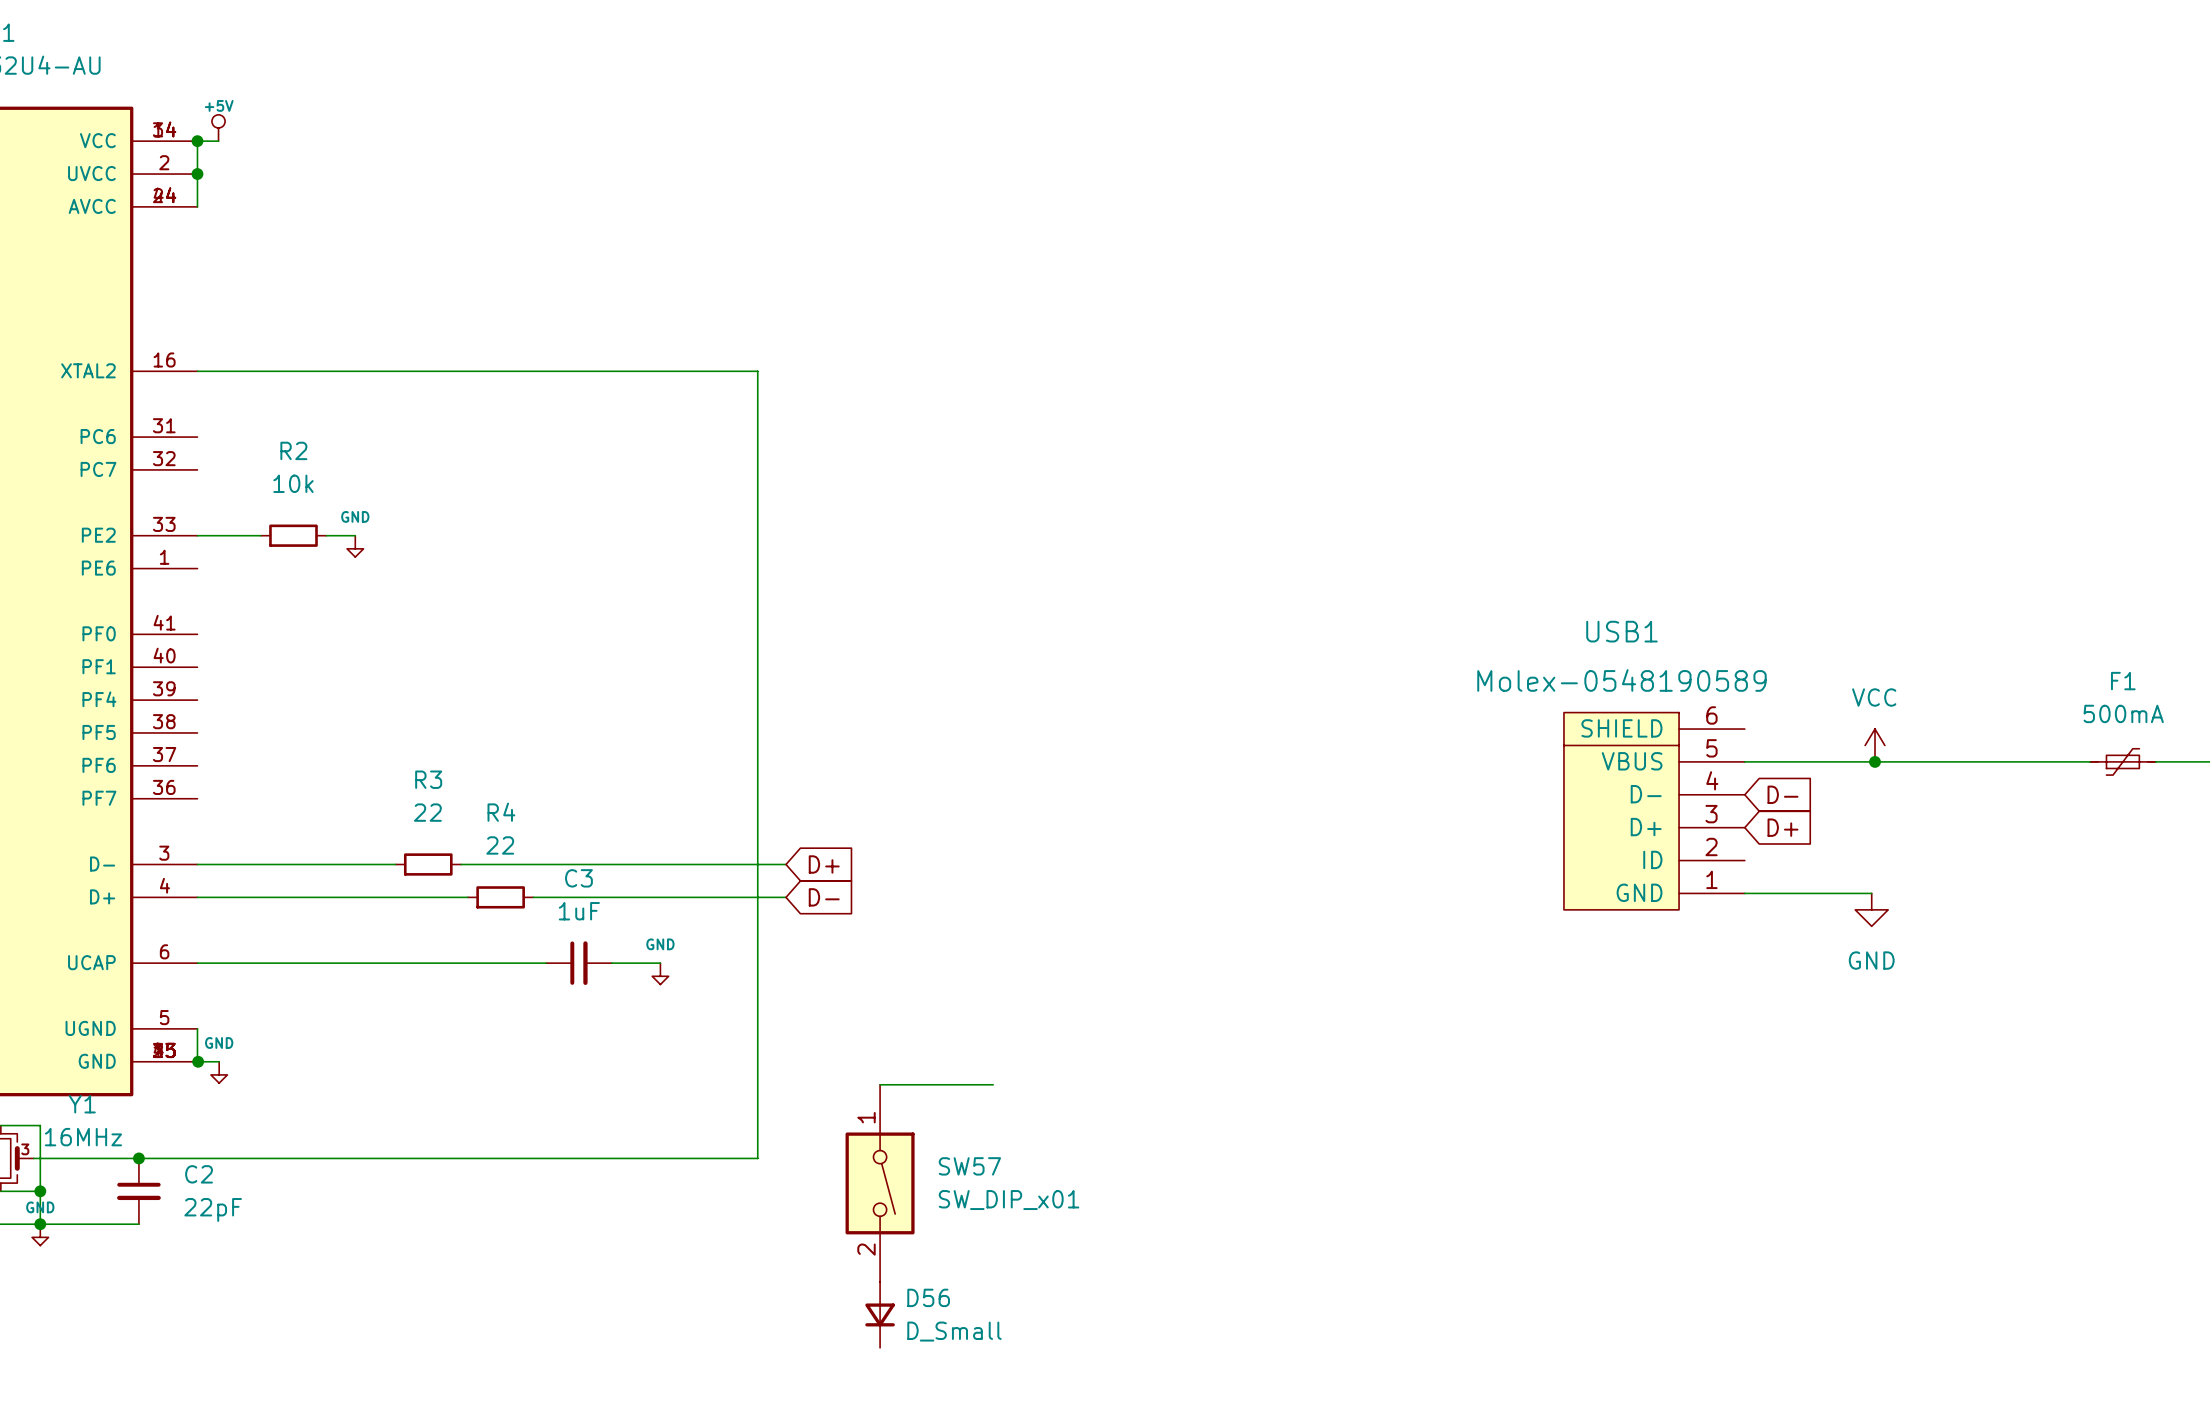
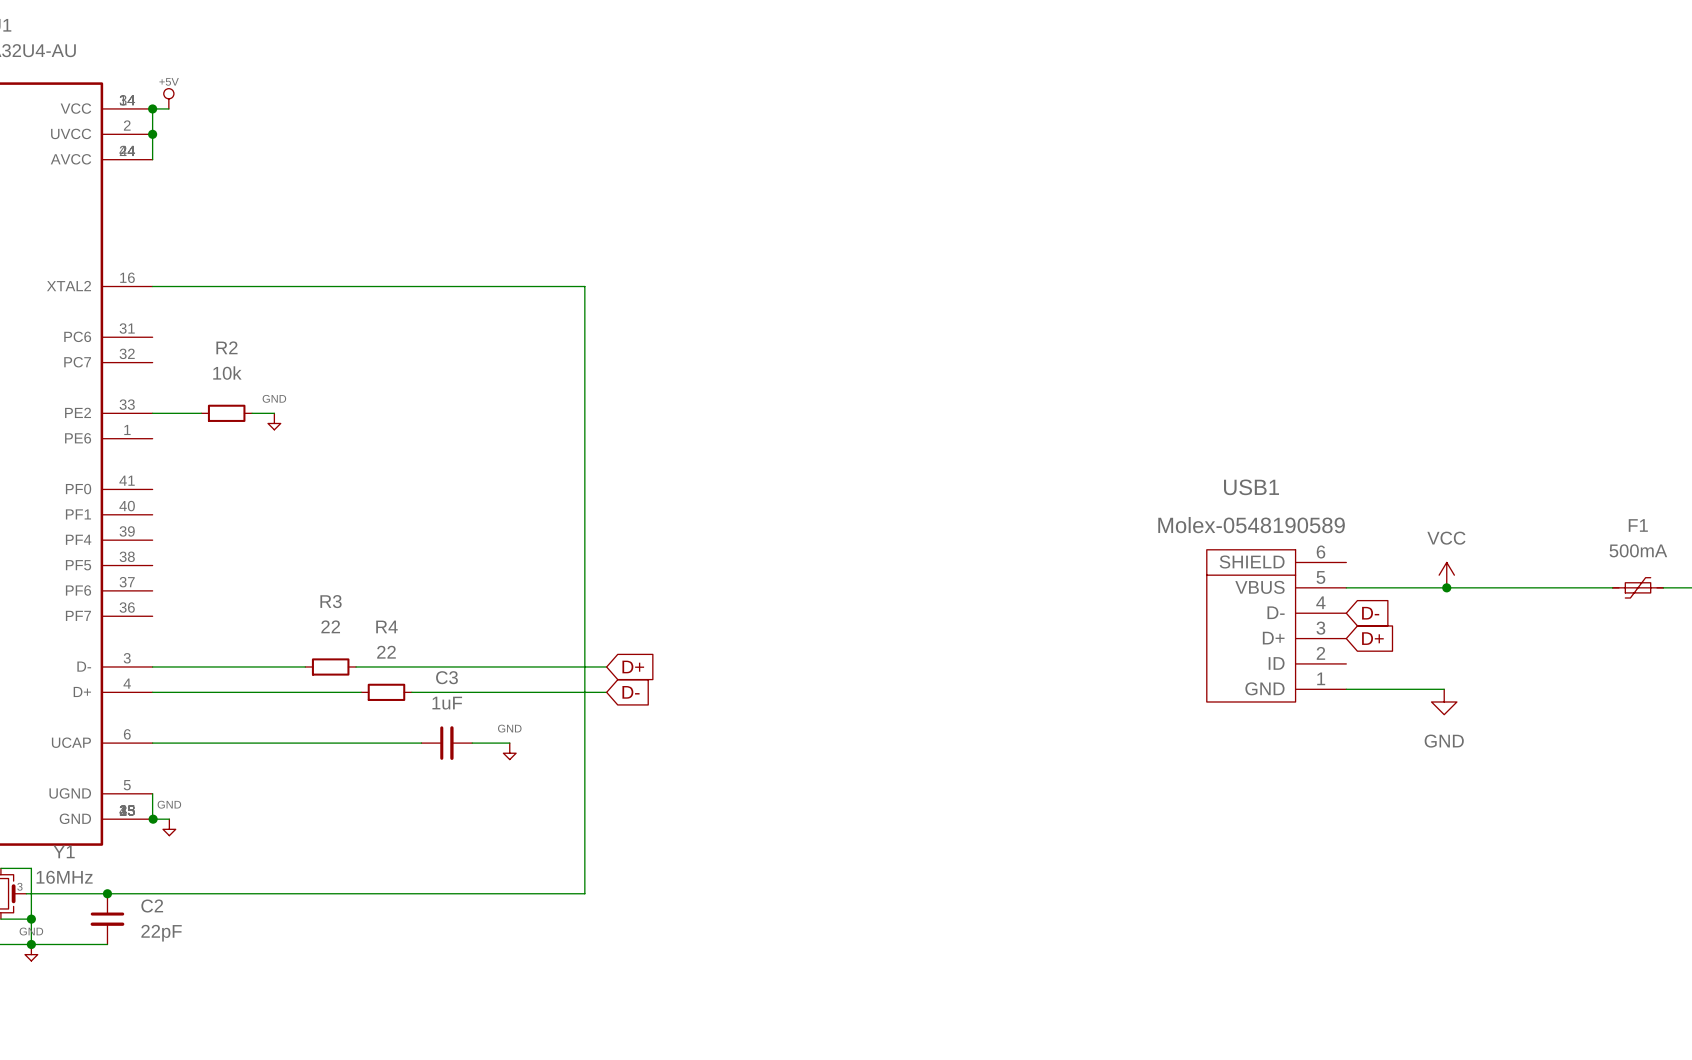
wire: (880, 1084) (993, 1084) -> none
SW57: SW_DIP_x01 (880, 1183) -> none
D56: D_Small (880, 1314) -> none

